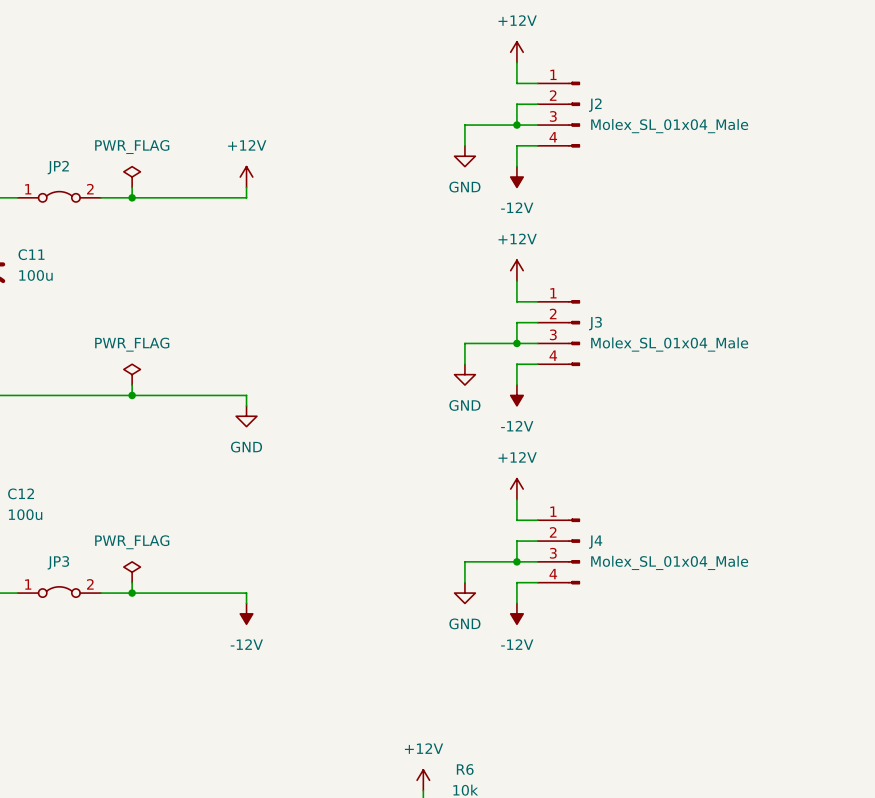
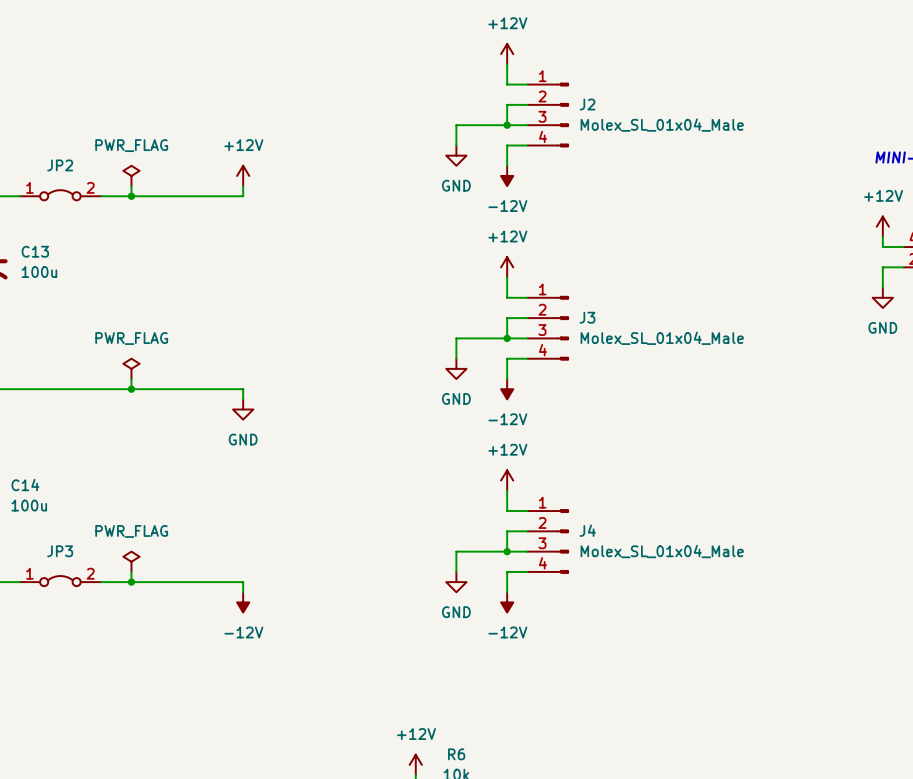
C11 name: C11 (31, 254) -> C13 (35, 251)
C12 name: C12 (21, 493) -> C14 (25, 485)

